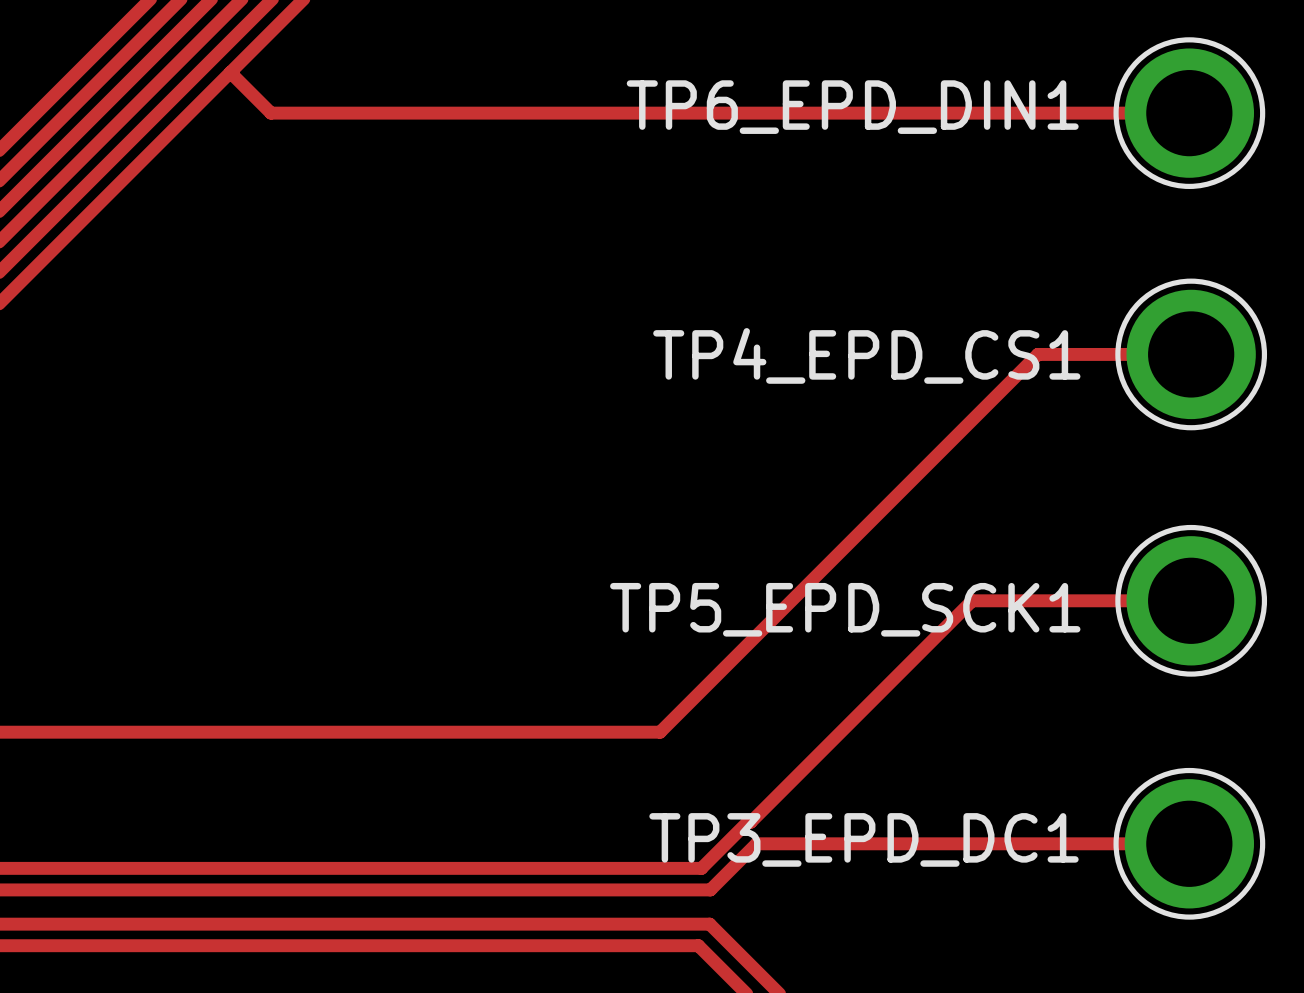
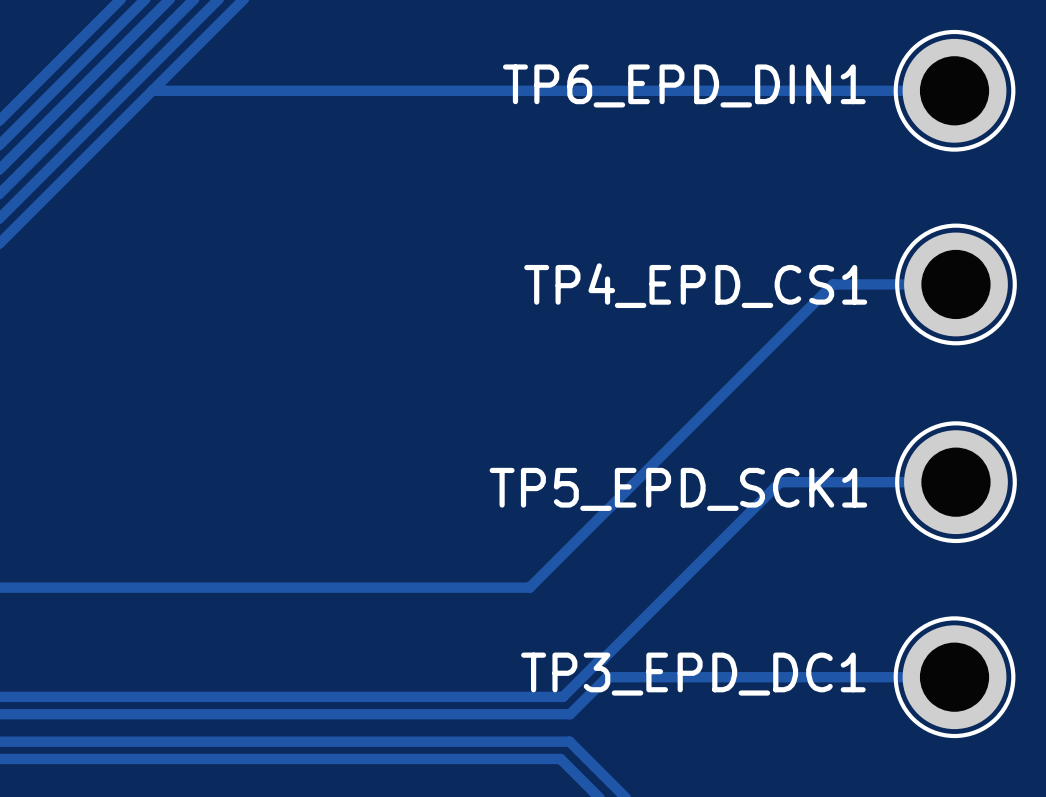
track: (230, 72) (270, 113) -> (152, 90) (217, 90)

